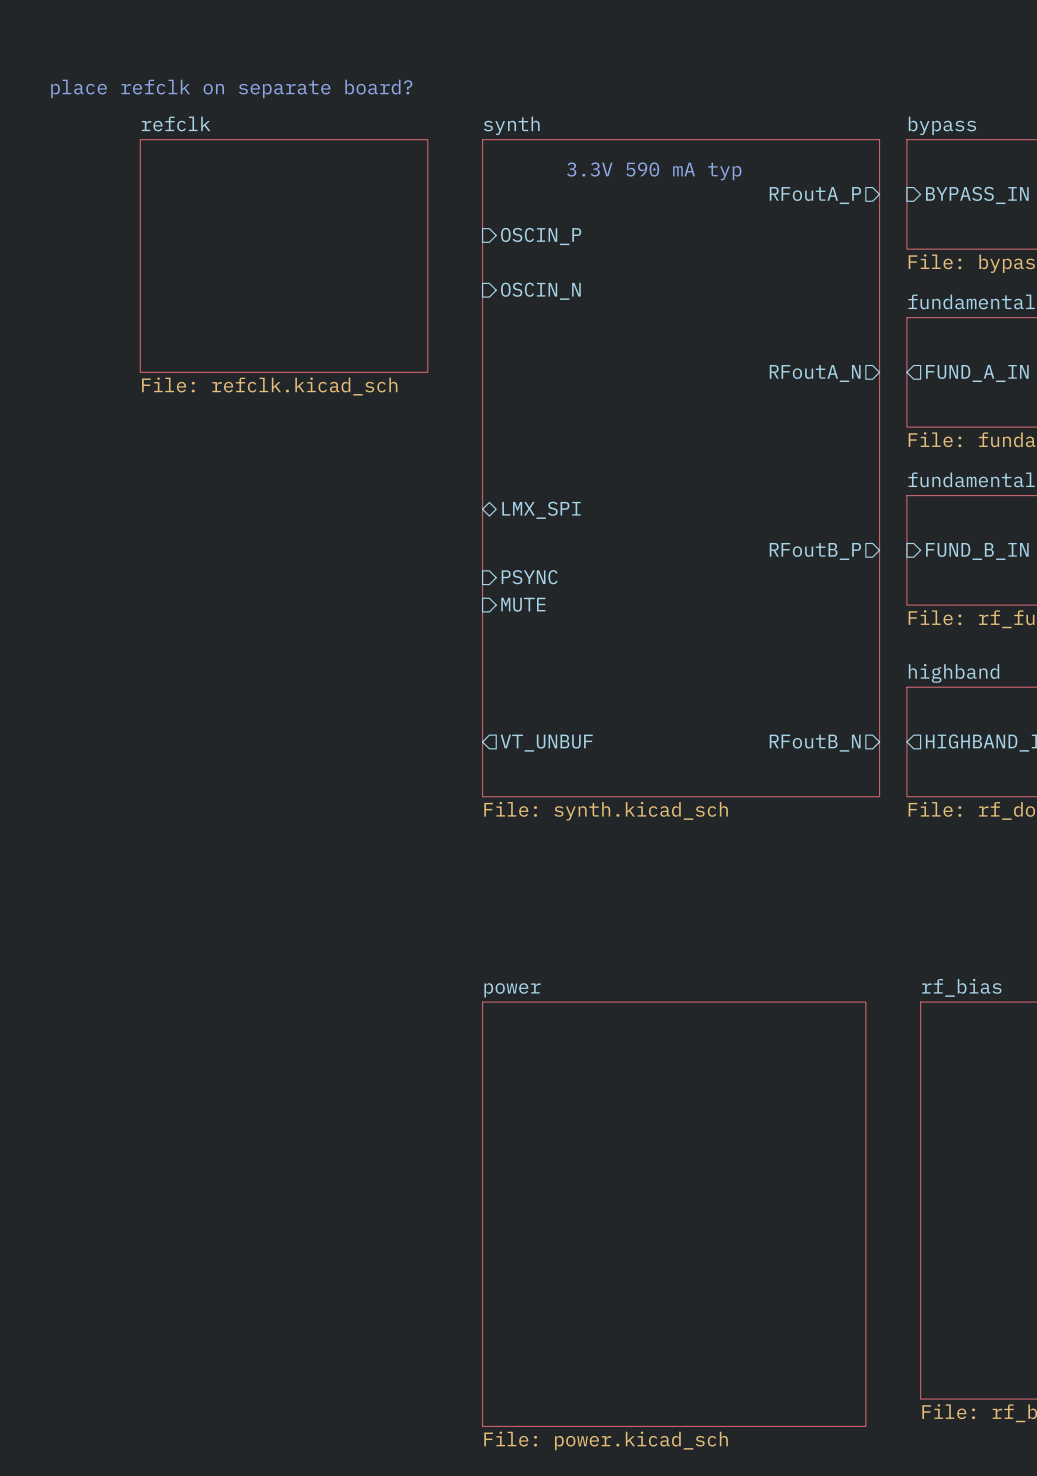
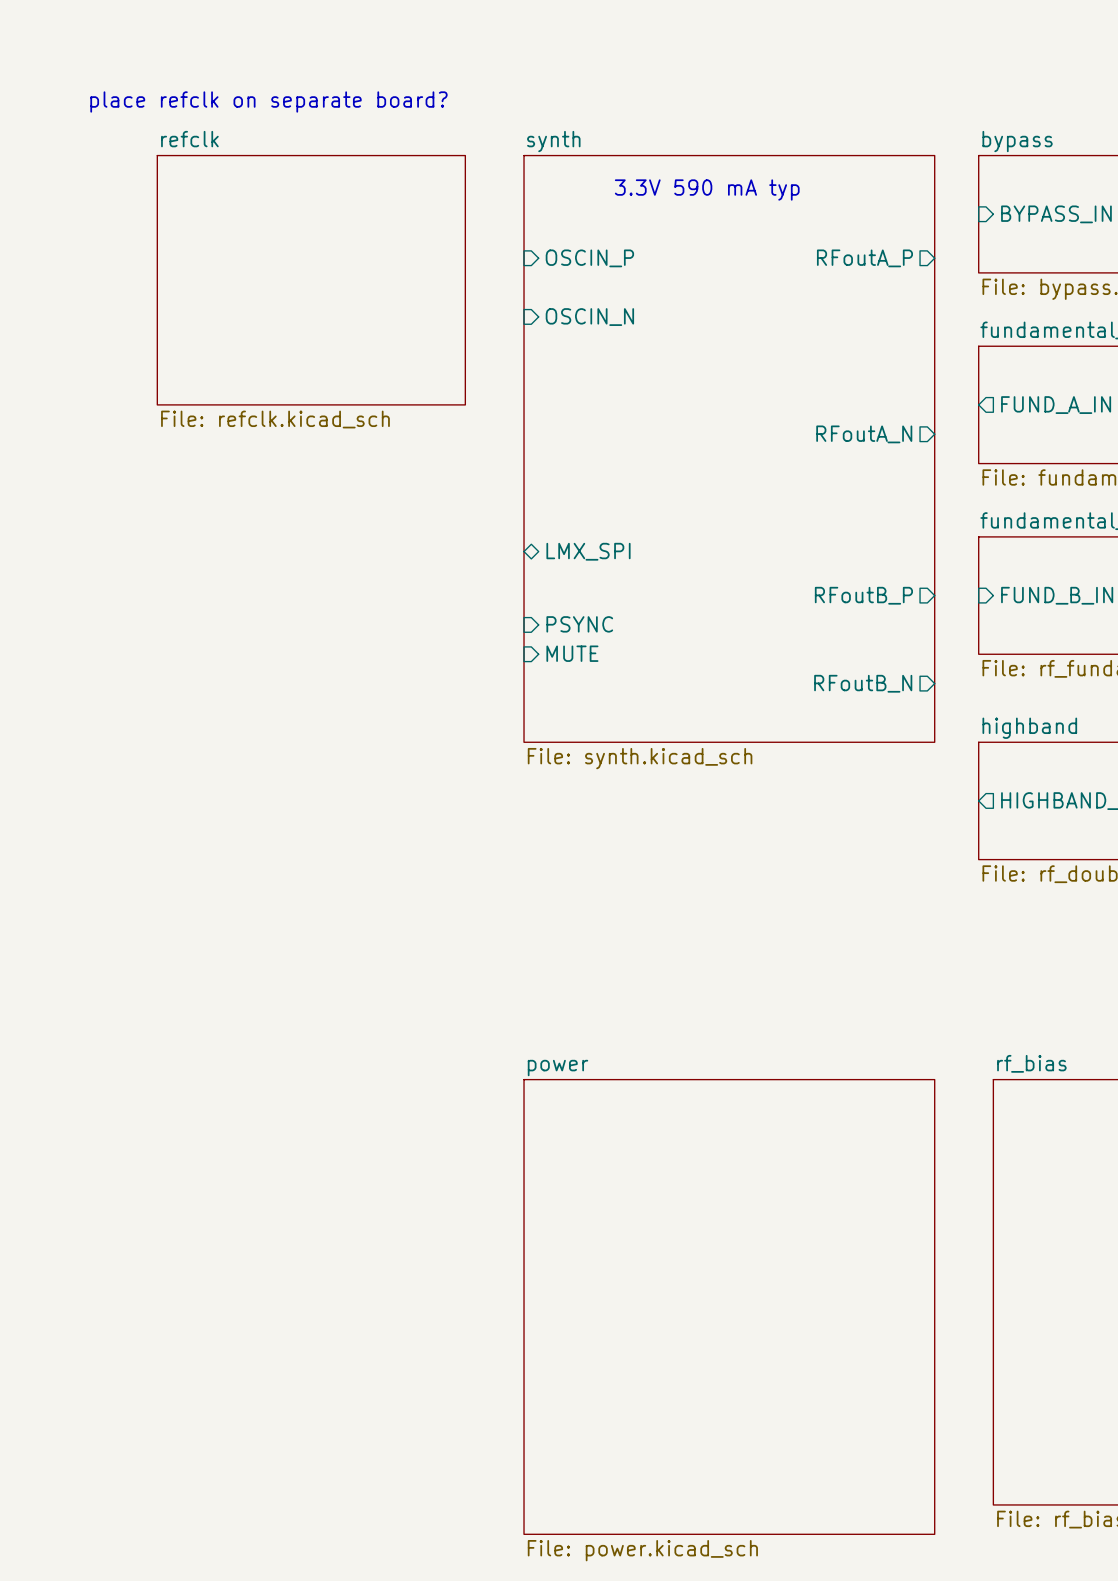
sheet pin position: RFoutA_P (815, 195) -> RFoutA_P (864, 258)
sheet pin position: RFoutA_N (815, 373) -> RFoutA_N (864, 434)
sheet synth: none -> File: synth.kicad_sch (729, 448)
sheet synth: File: synth.kicad_sch (681, 468) -> none
sheet pin position: RFoutB_P (815, 551) -> RFoutB_P (863, 595)
sheet pin: VT_UNBUF (546, 743) -> none
sheet pin position: RFoutB_N (815, 743) -> RFoutB_N (863, 683)

